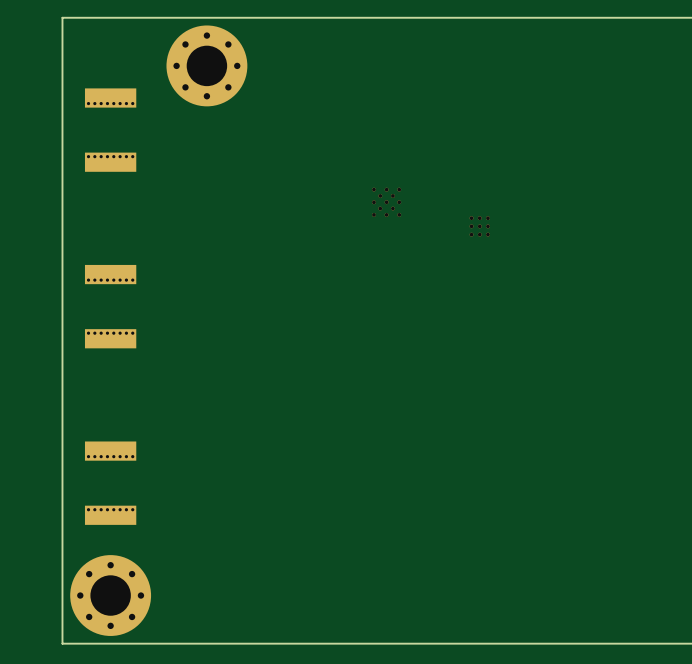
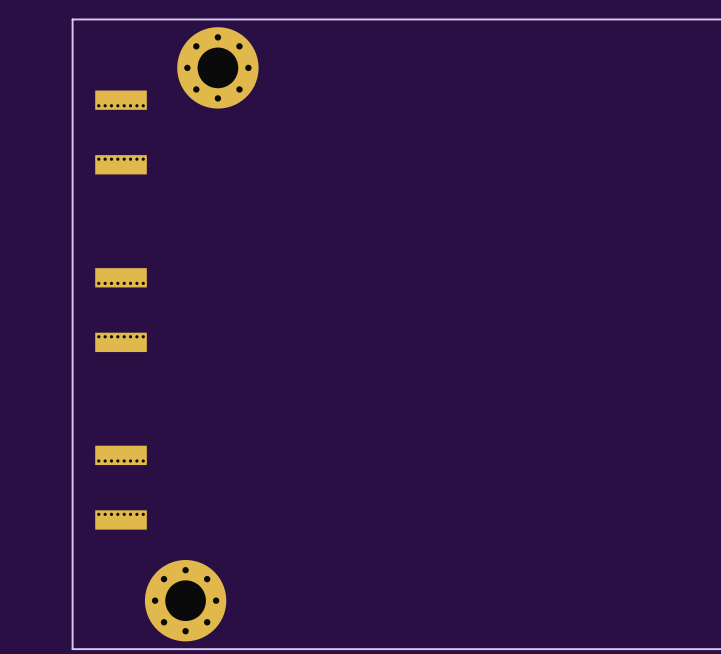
part: (386, 202) -> none
part: (479, 226) -> none
part: (110, 595) -> none
part: none -> (185, 600)

